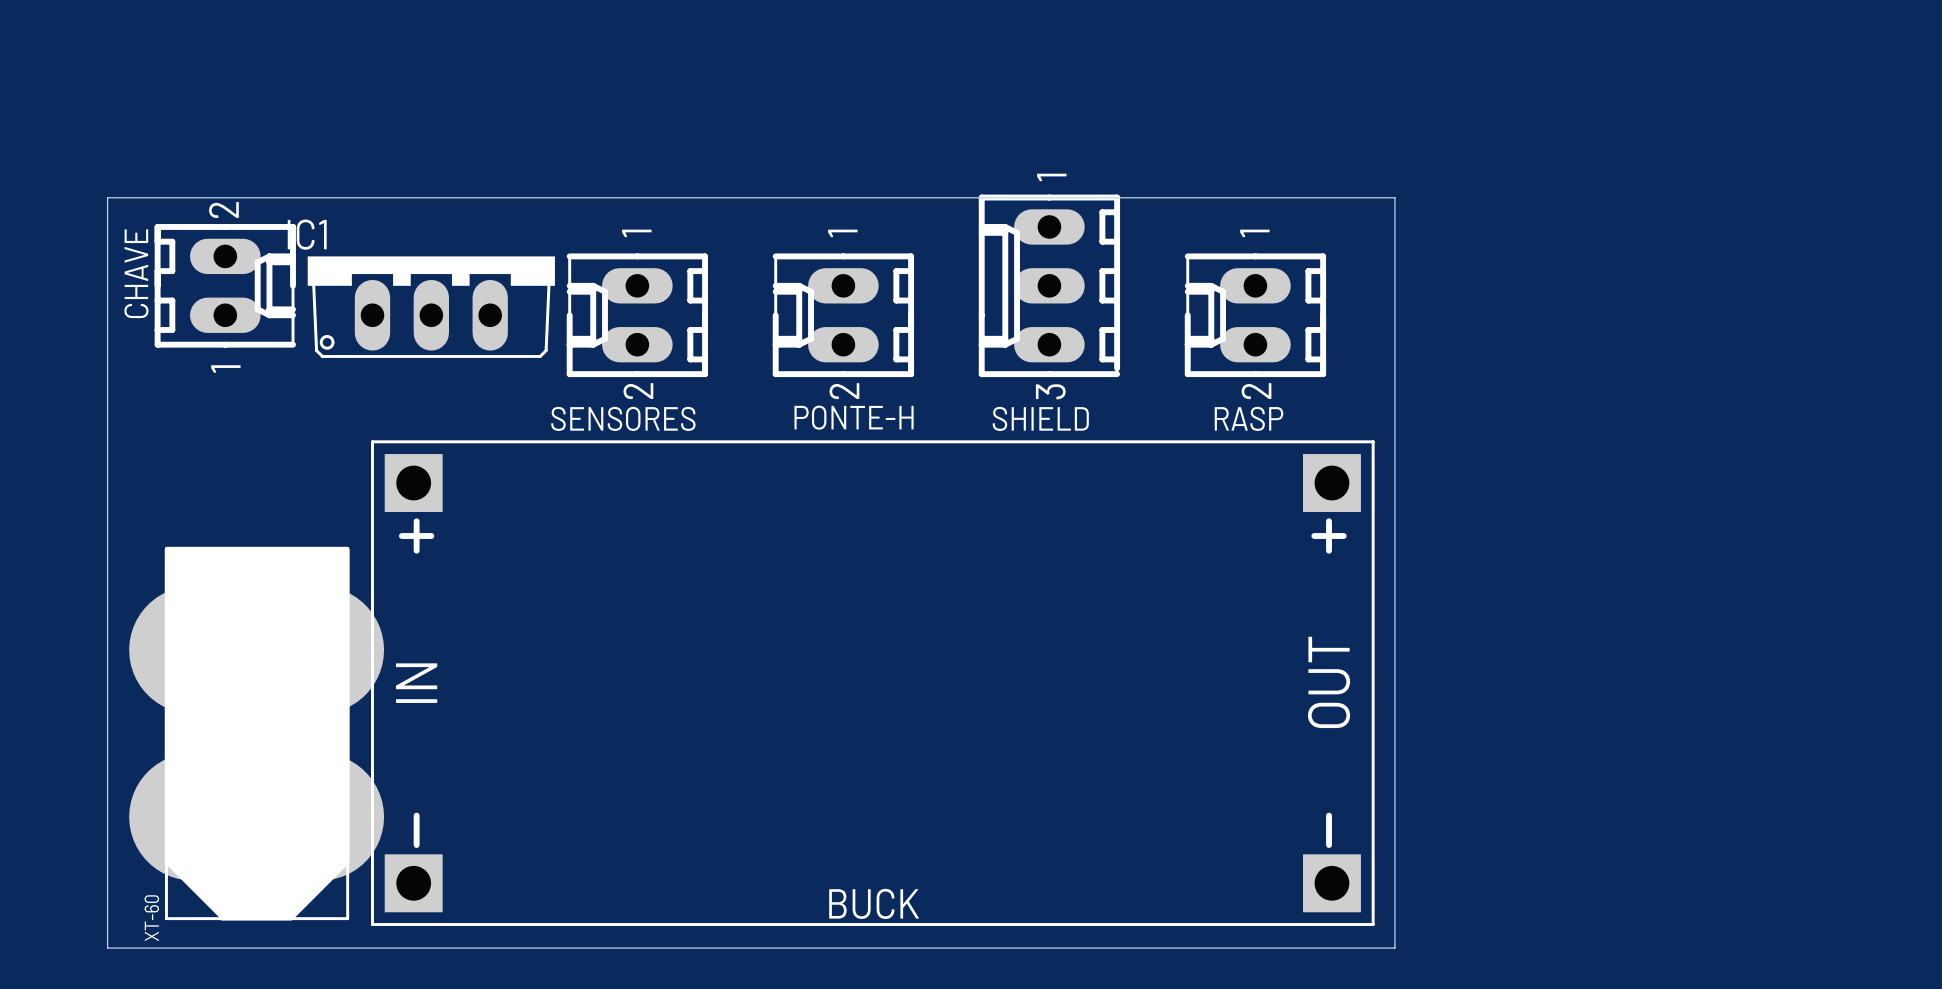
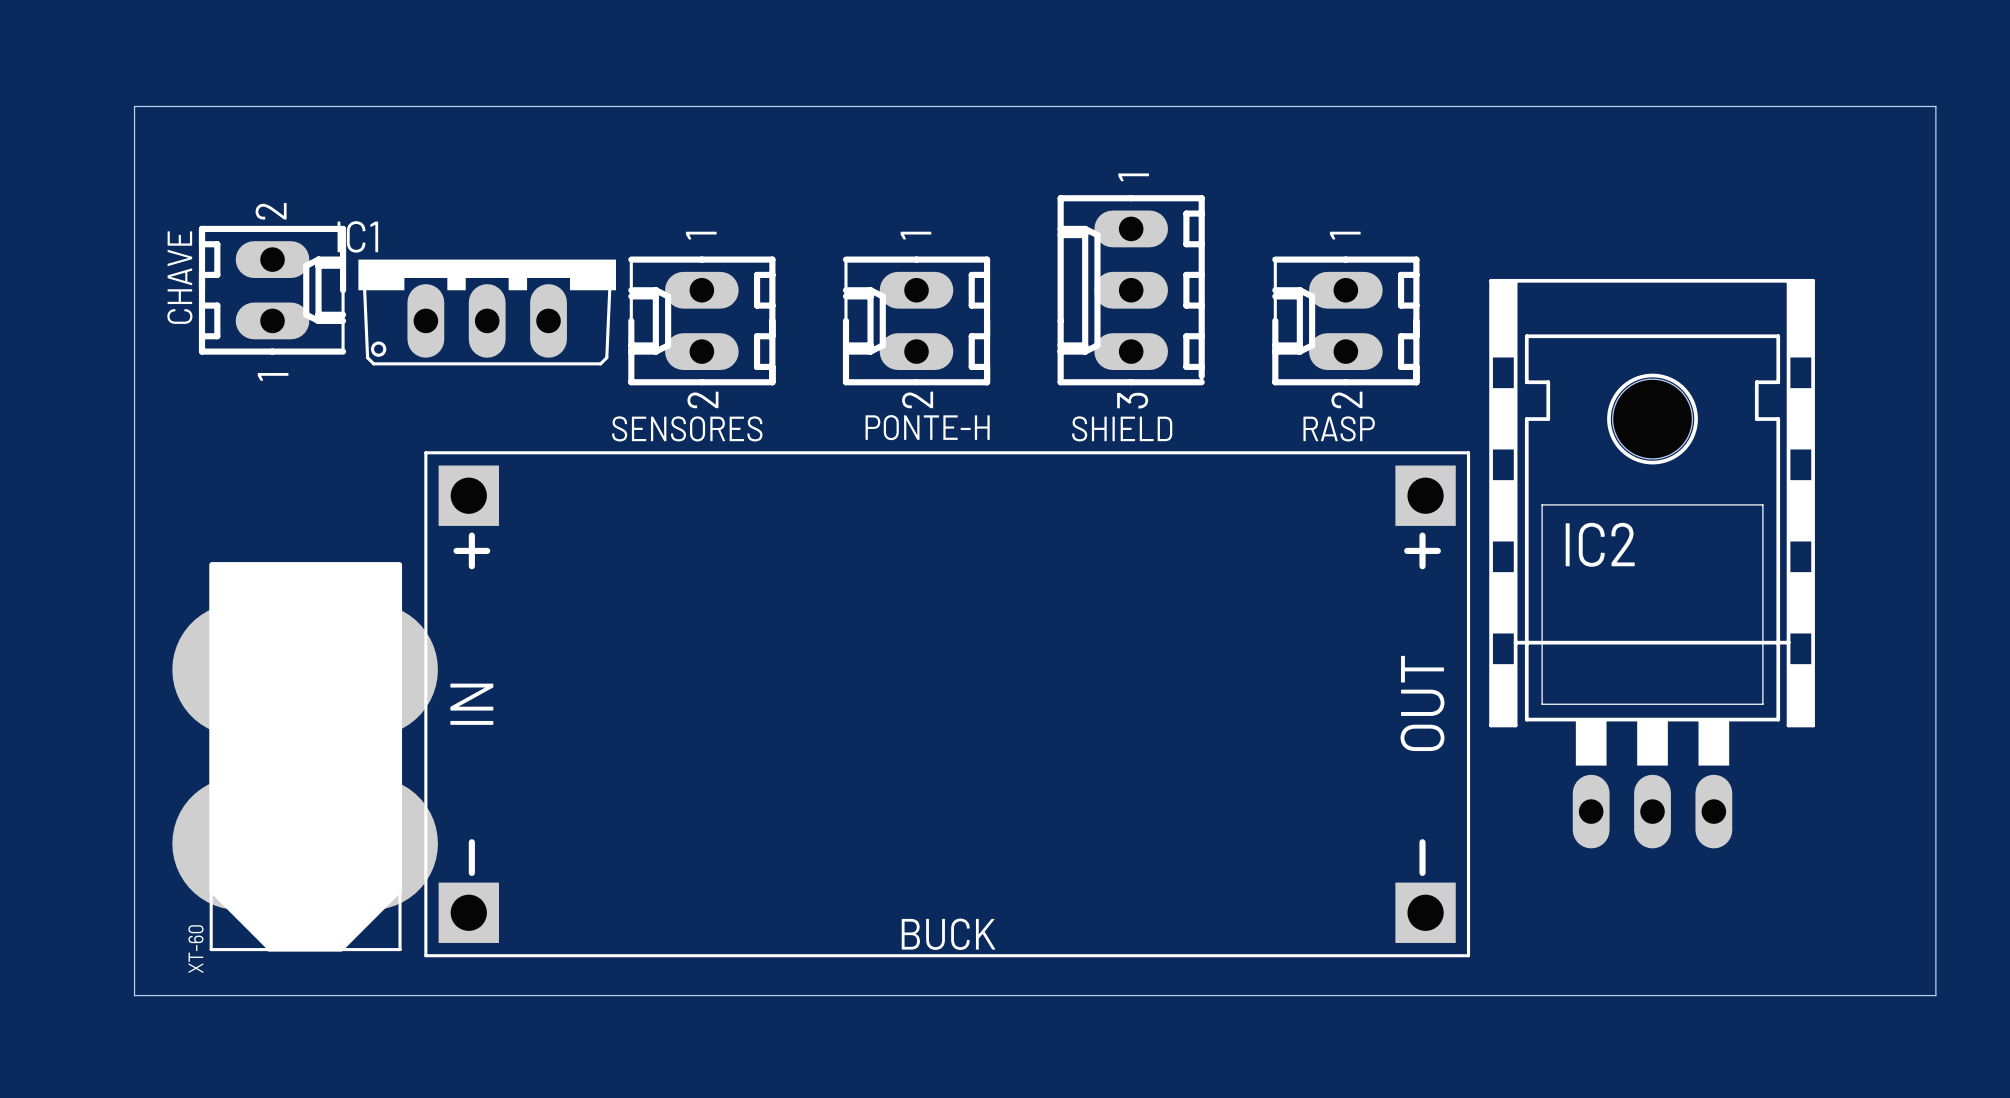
board edge: (107, 197) (1394, 197) (1394, 948) (107, 948) (107, 197) -> (134, 106) (134, 995) (1935, 995) (1935, 106) (134, 106)
IC2: none -> (1652, 563)

